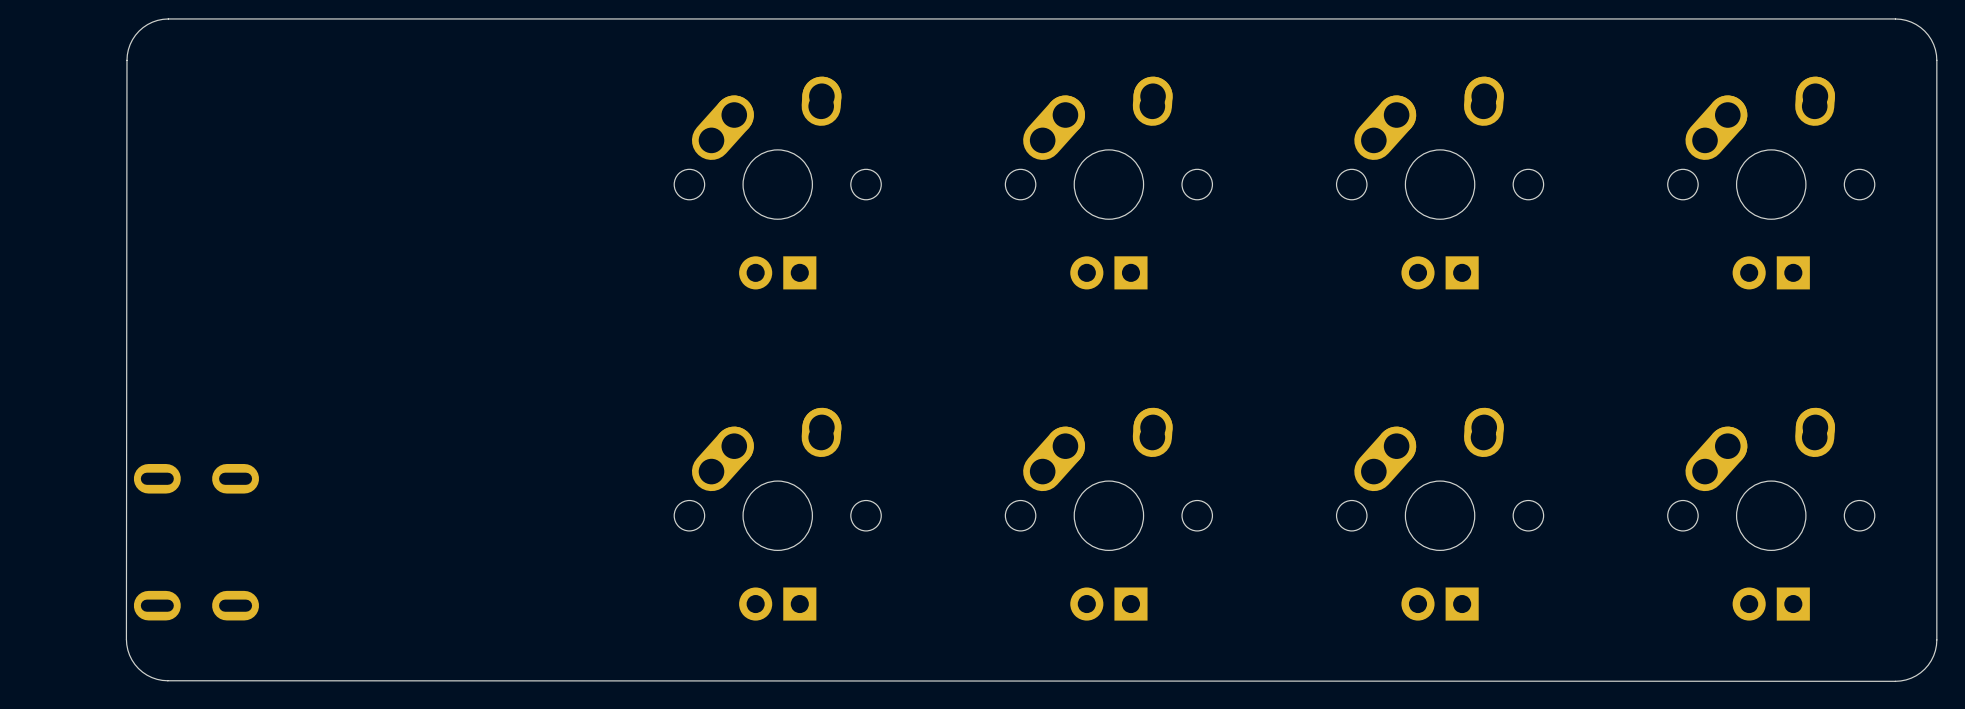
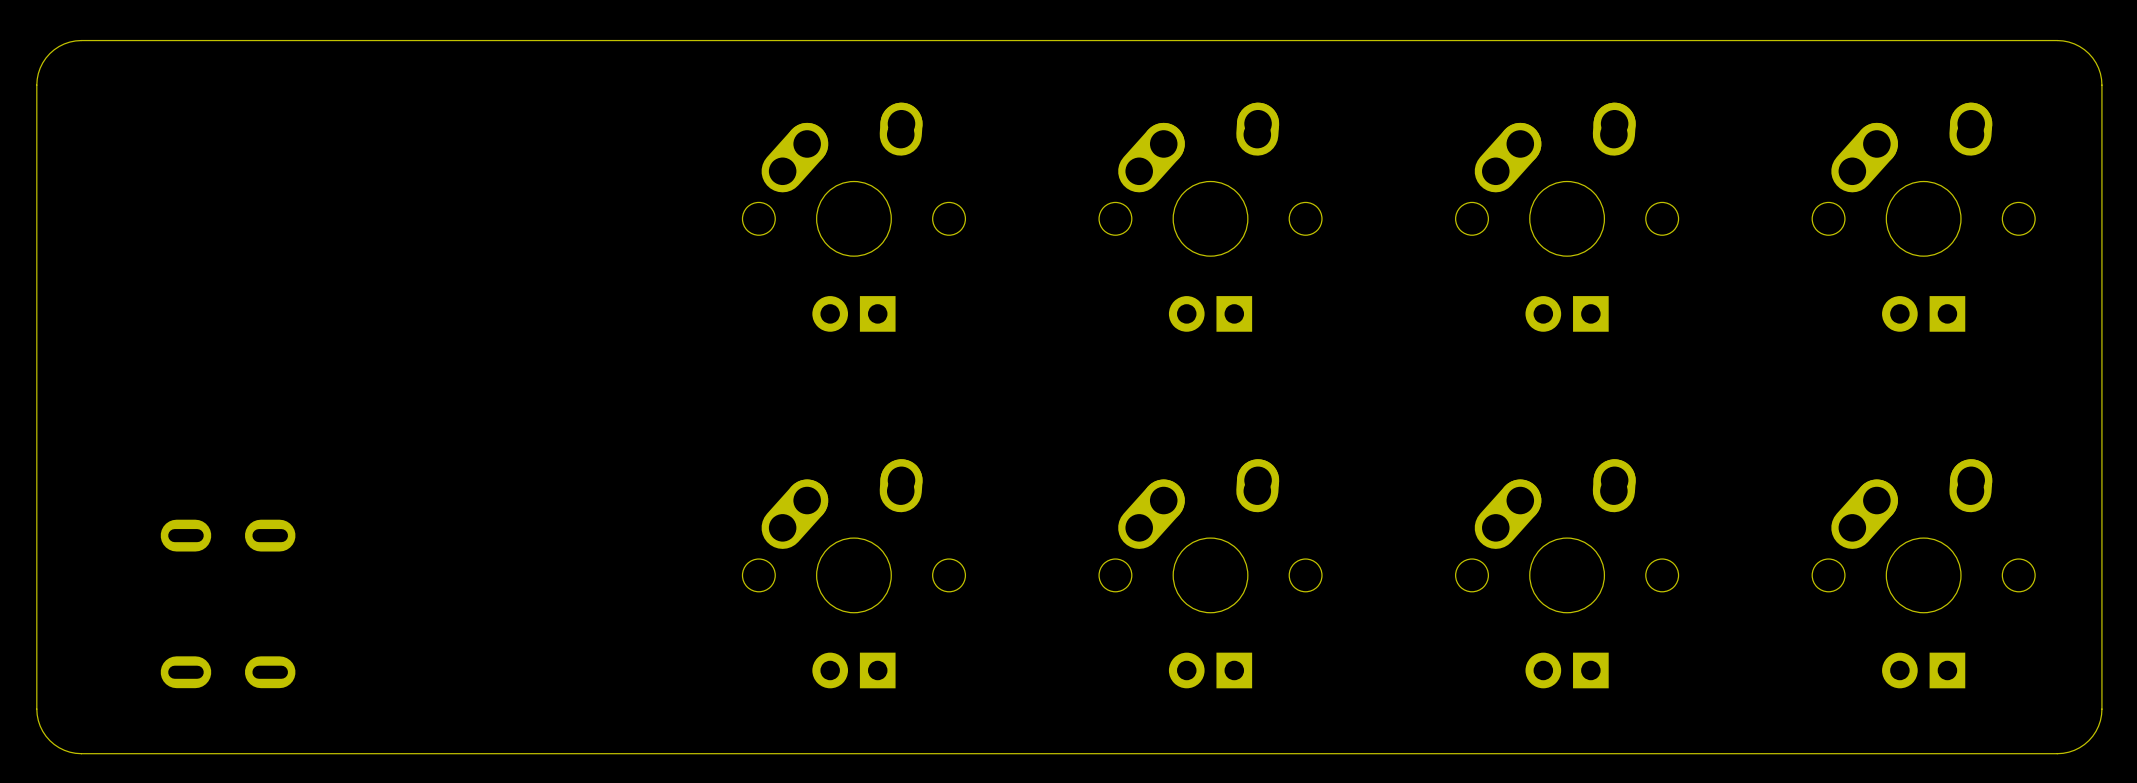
board edge: (168, 18) (152, 22) (139, 31) (130, 44) (126, 60) (126, 639) (127, 650) (134, 664) (151, 677) (167, 680) (1895, 681) -> (81, 753) (2057, 753)
board edge: none -> (197, 40) (69, 42) (59, 46) (46, 57) (40, 68) (37, 79) (36, 709) (40, 726) (49, 740) (64, 750) (81, 753)

